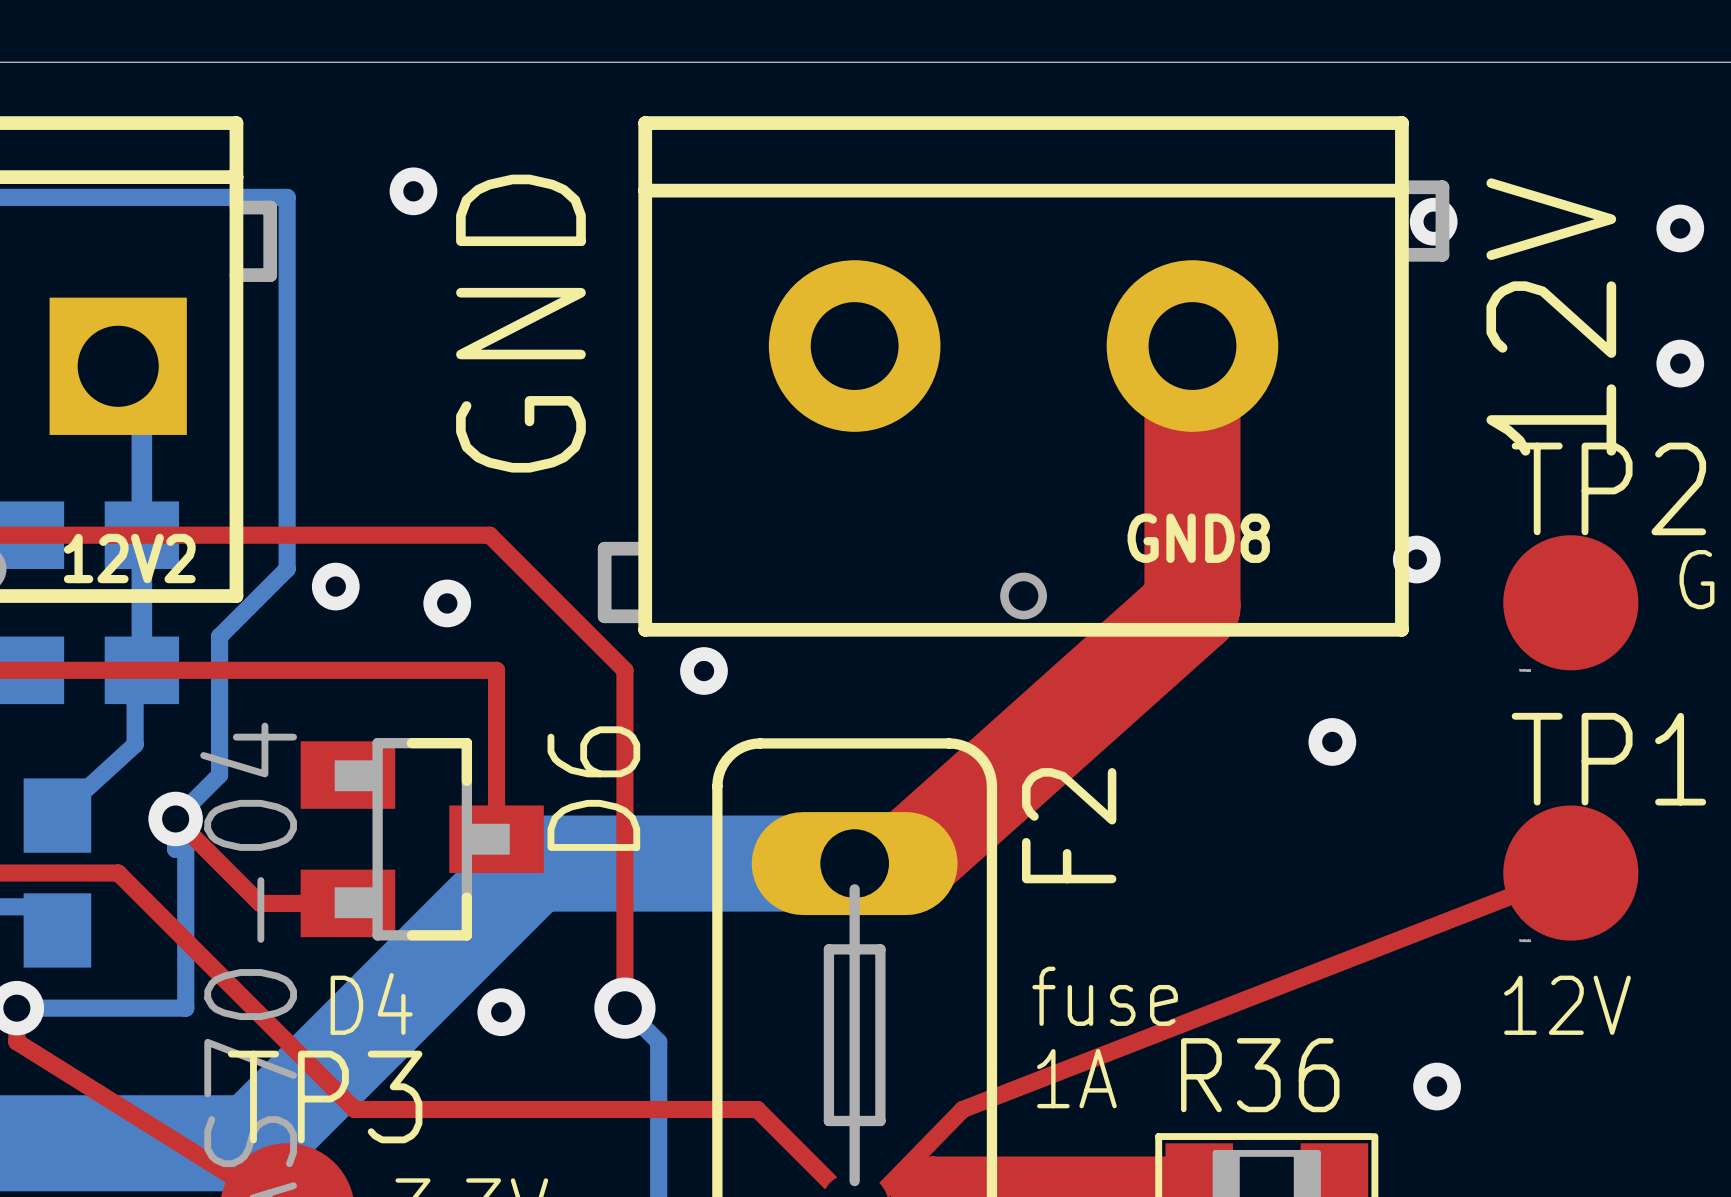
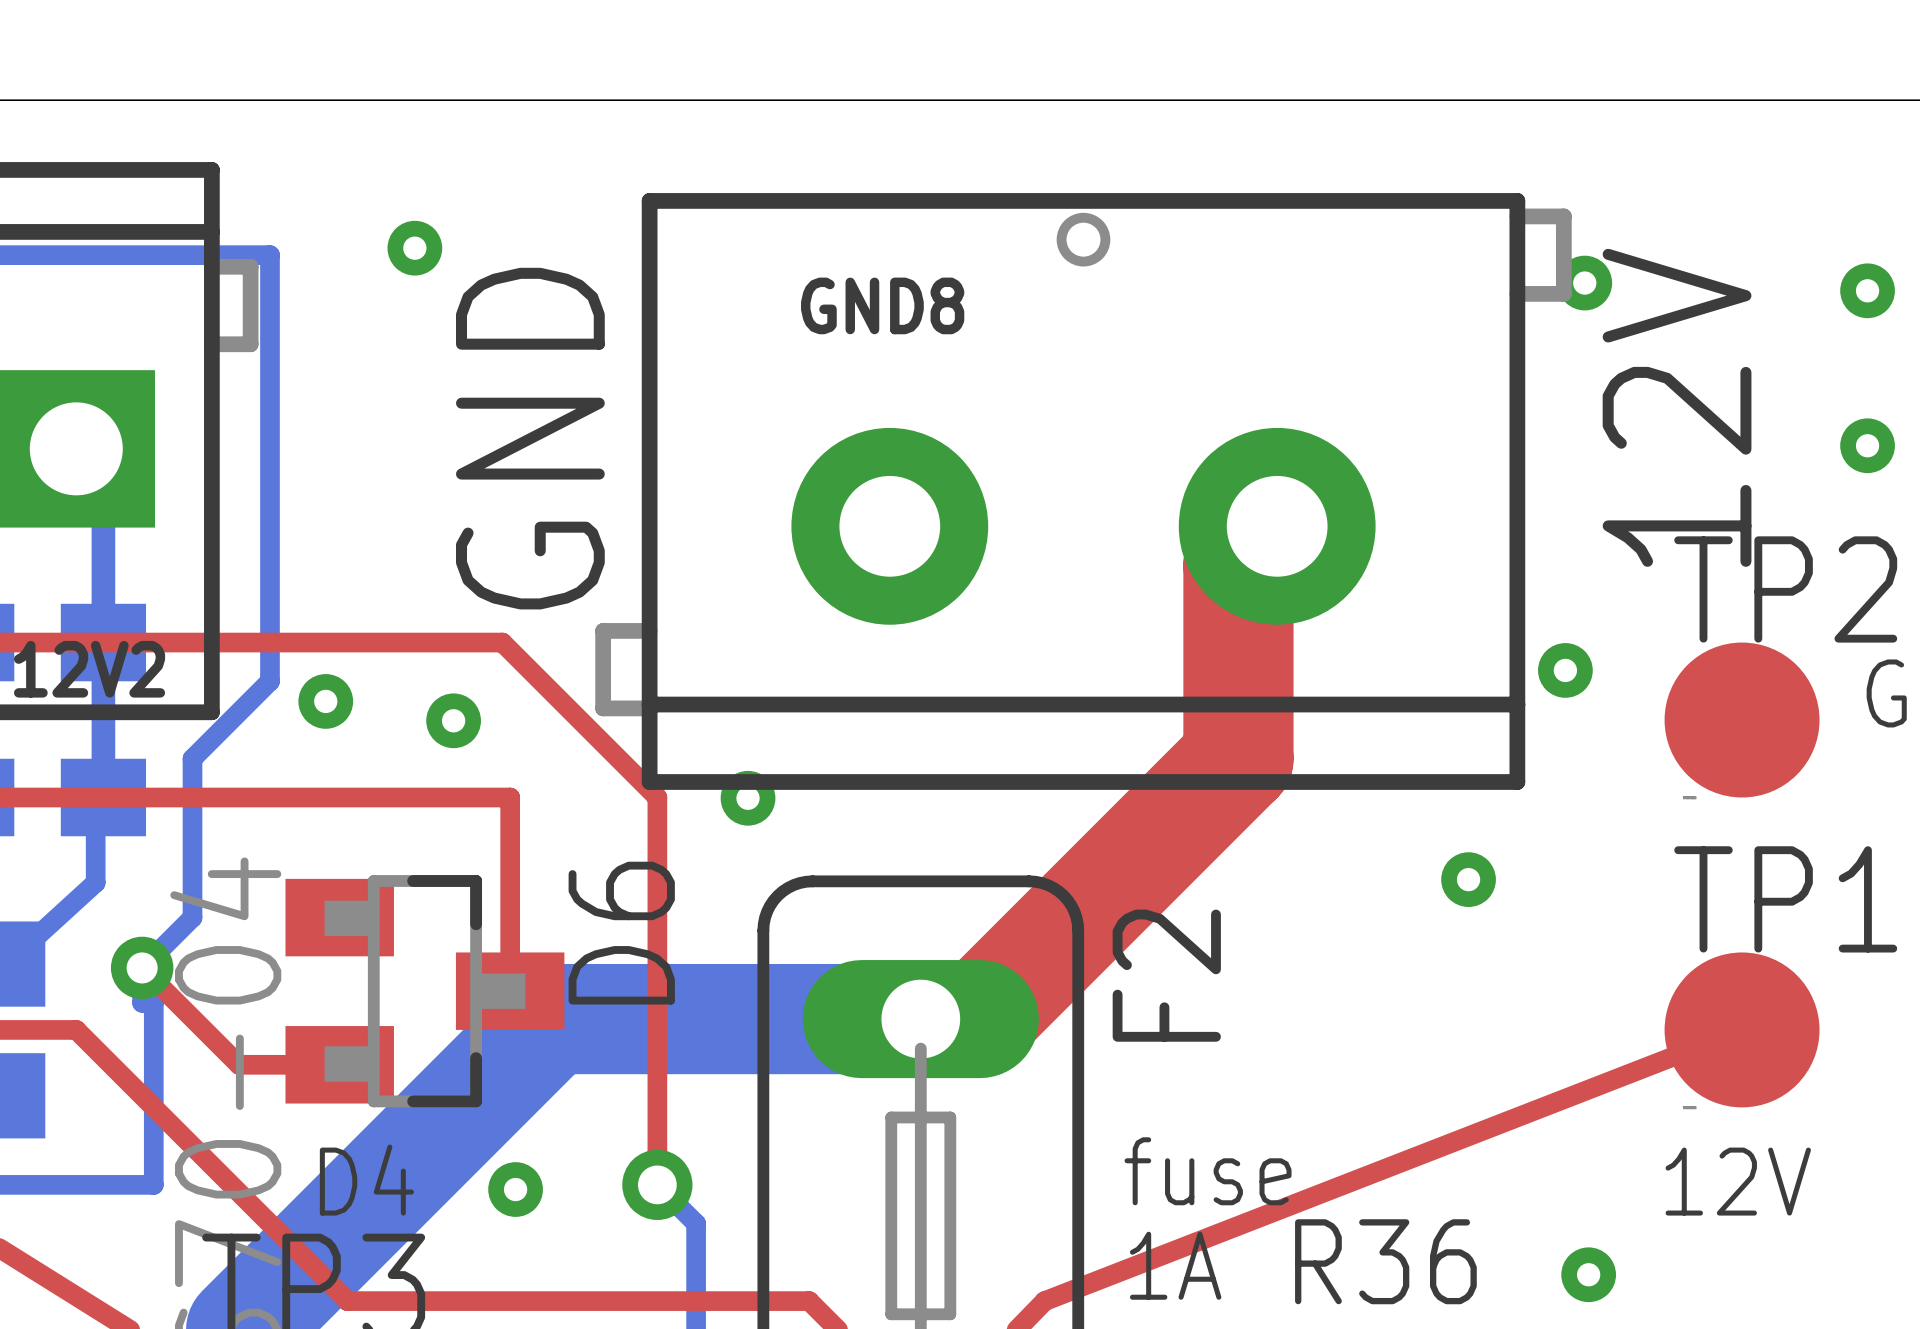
text position: 12V (1551, 317) -> 12V (1677, 407)
text position: GND (520, 323) -> GND (530, 438)
top track: (1192, 346) (1192, 606) (904, 863) -> (1277, 526) (1238, 565) (1238, 758) (978, 1019)
GND8 rotation: 0° (1023, 376) -> 180° (1083, 491)

